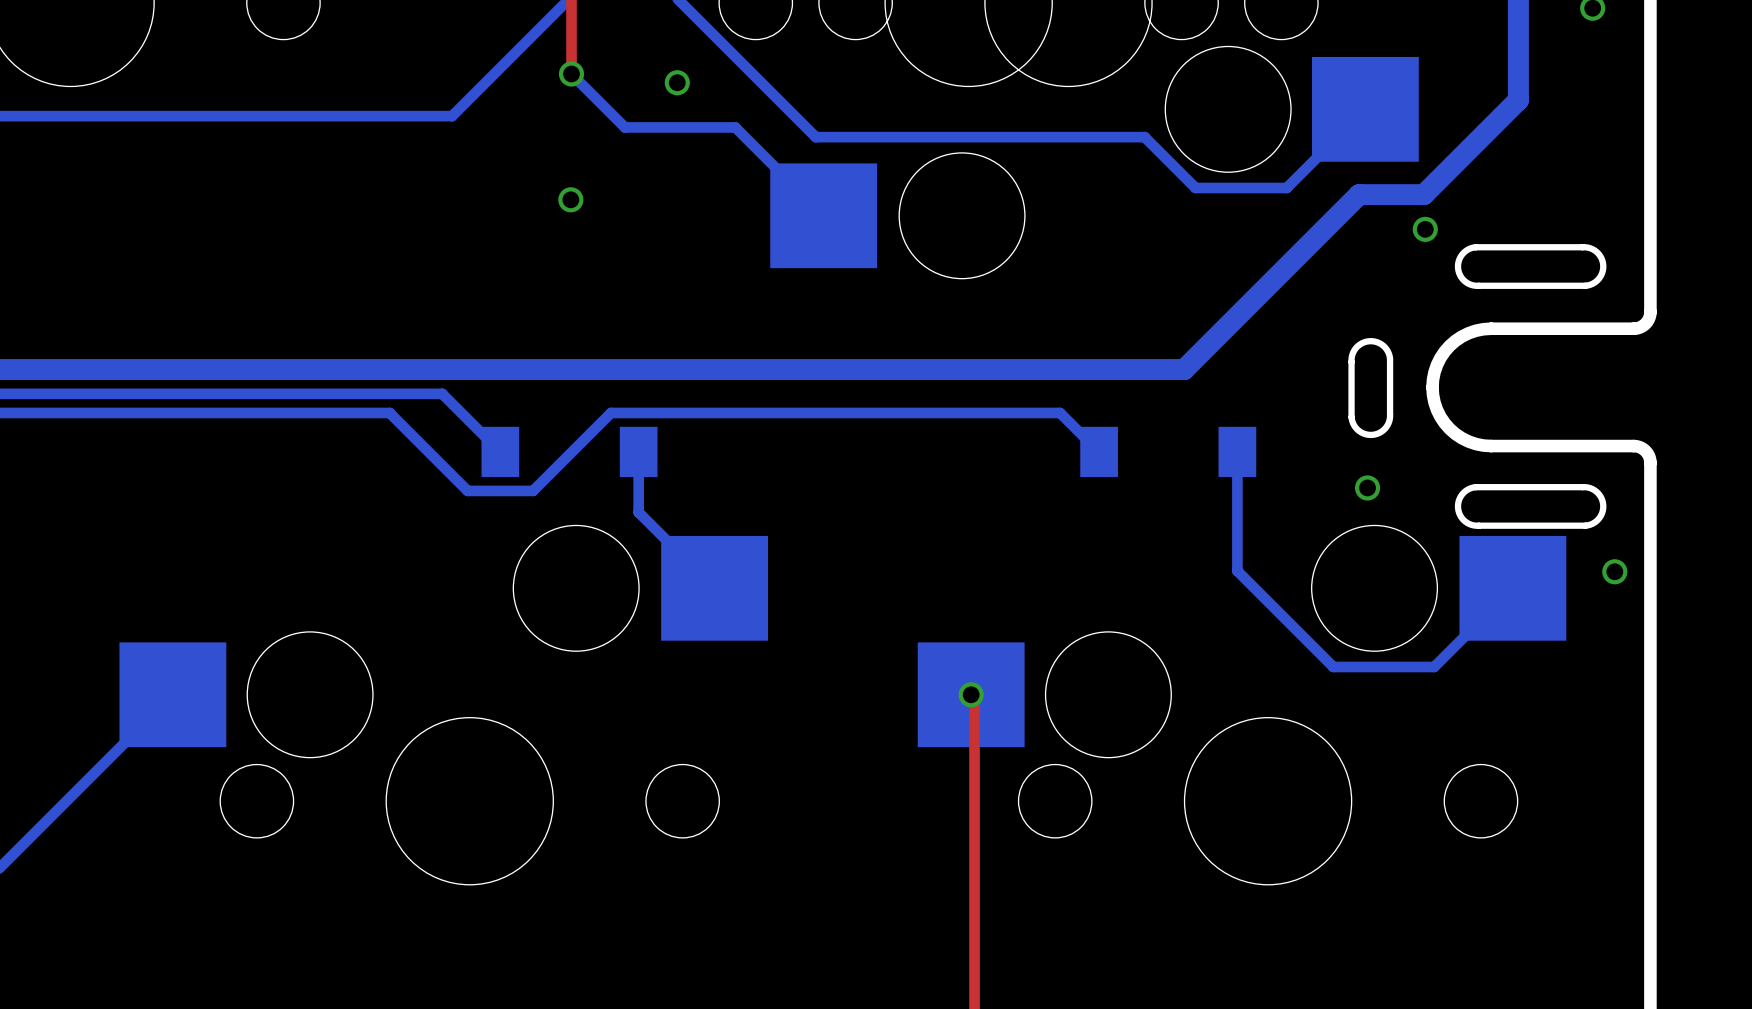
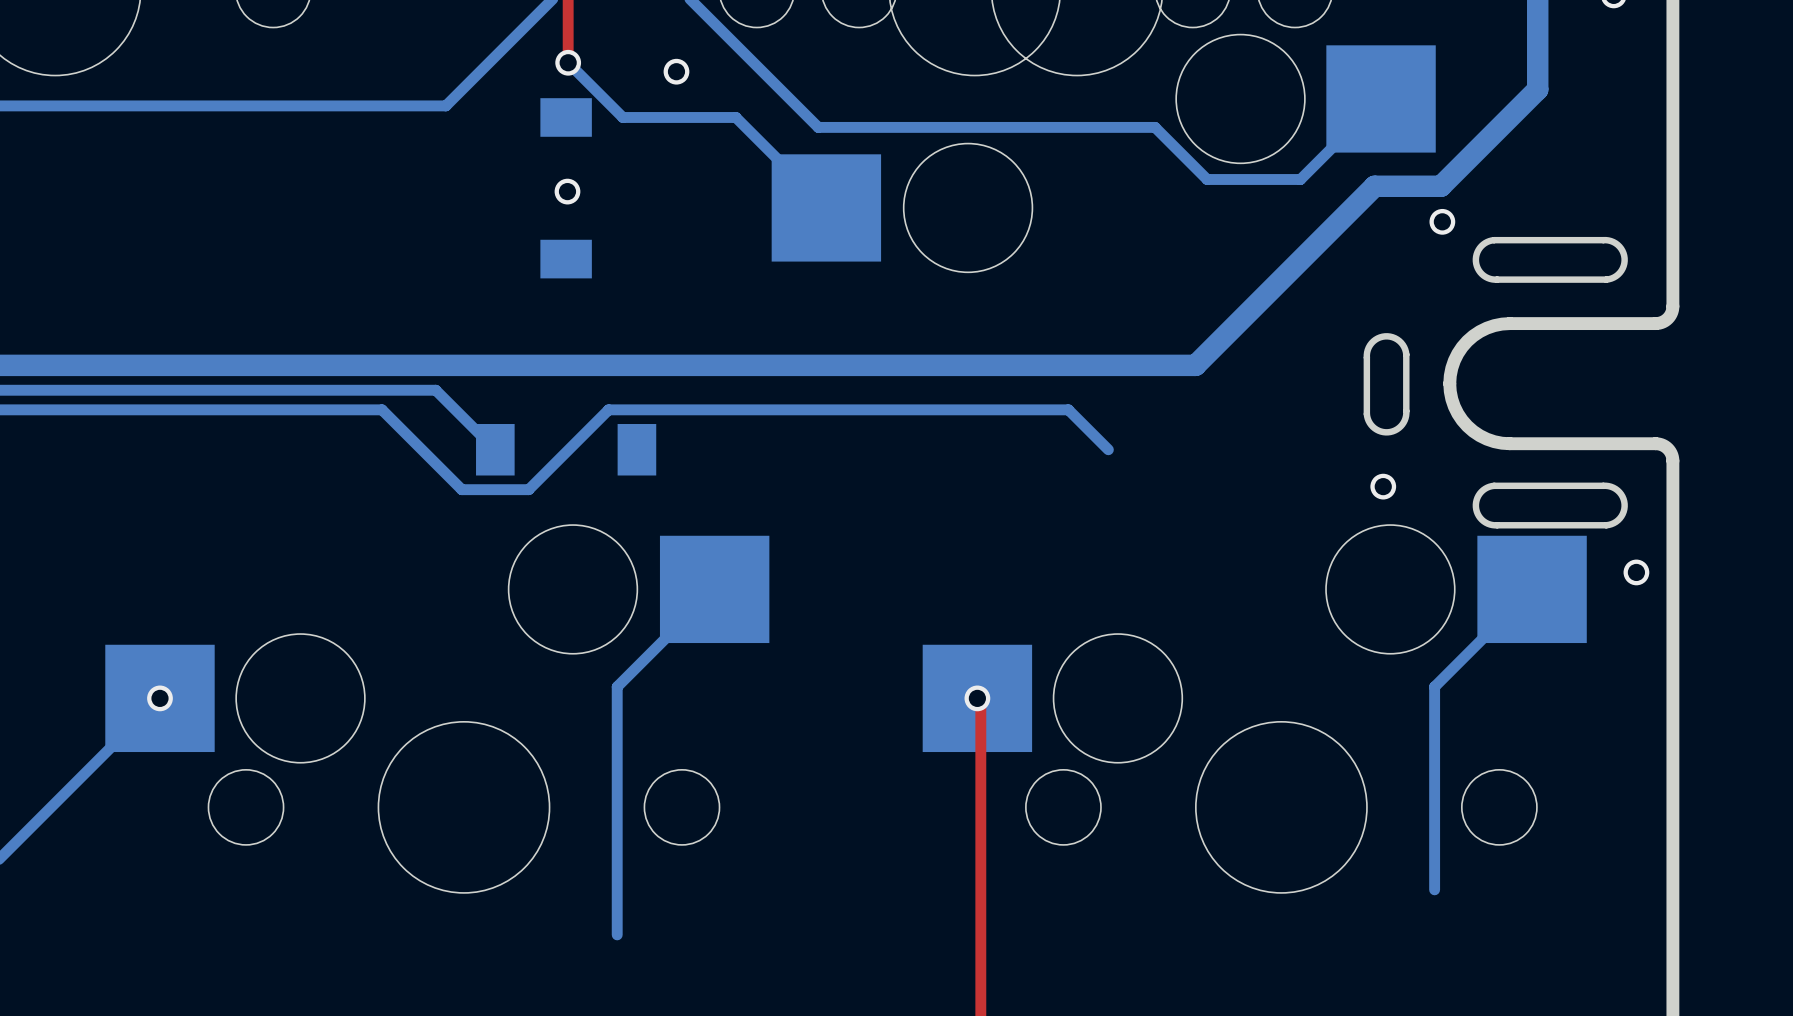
part: none -> (566, 188)
bottom track: (638, 451) (638, 512) (714, 588) -> (617, 934) (617, 686) (714, 589)
part: (1168, 451) -> none
bottom track: (1237, 451) (1237, 570) (1333, 666) (1434, 666) -> (1434, 889) (1434, 686) (1451, 669)
via: none -> (159, 698)

